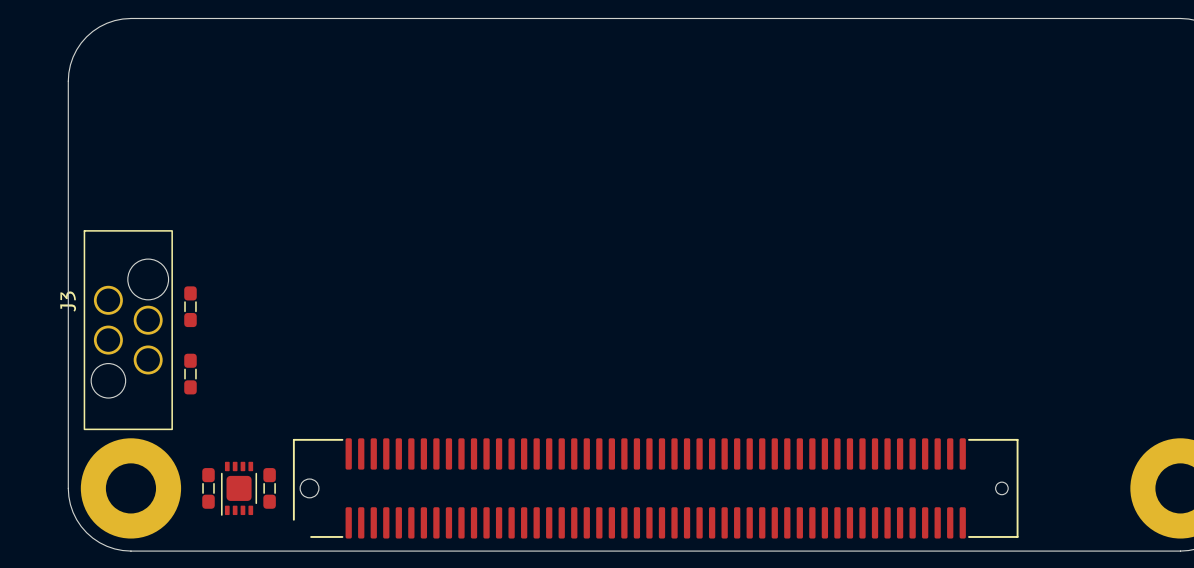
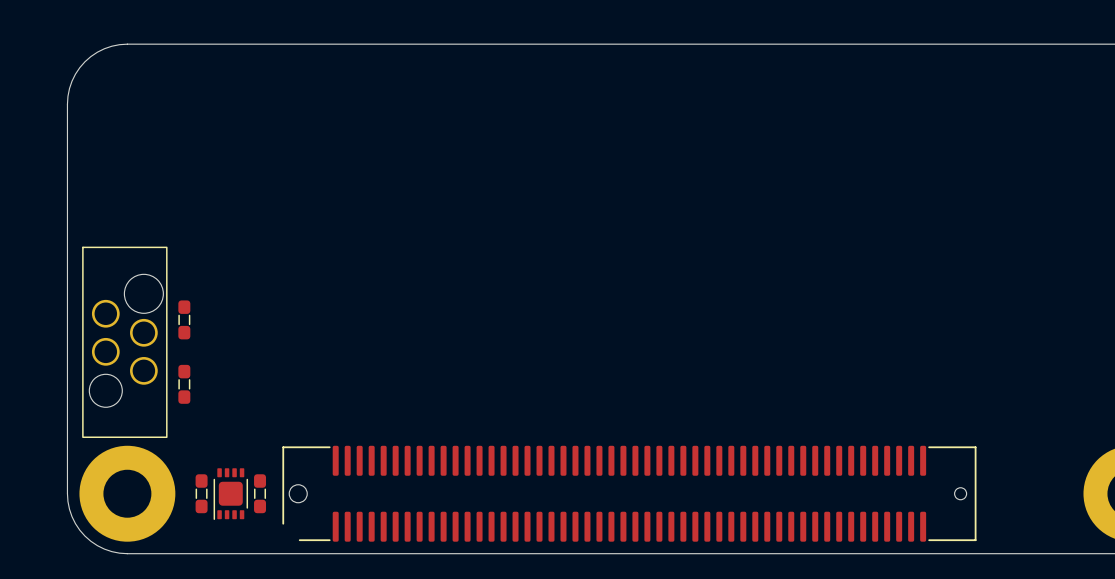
J3 name: J3 (68, 301) -> none

